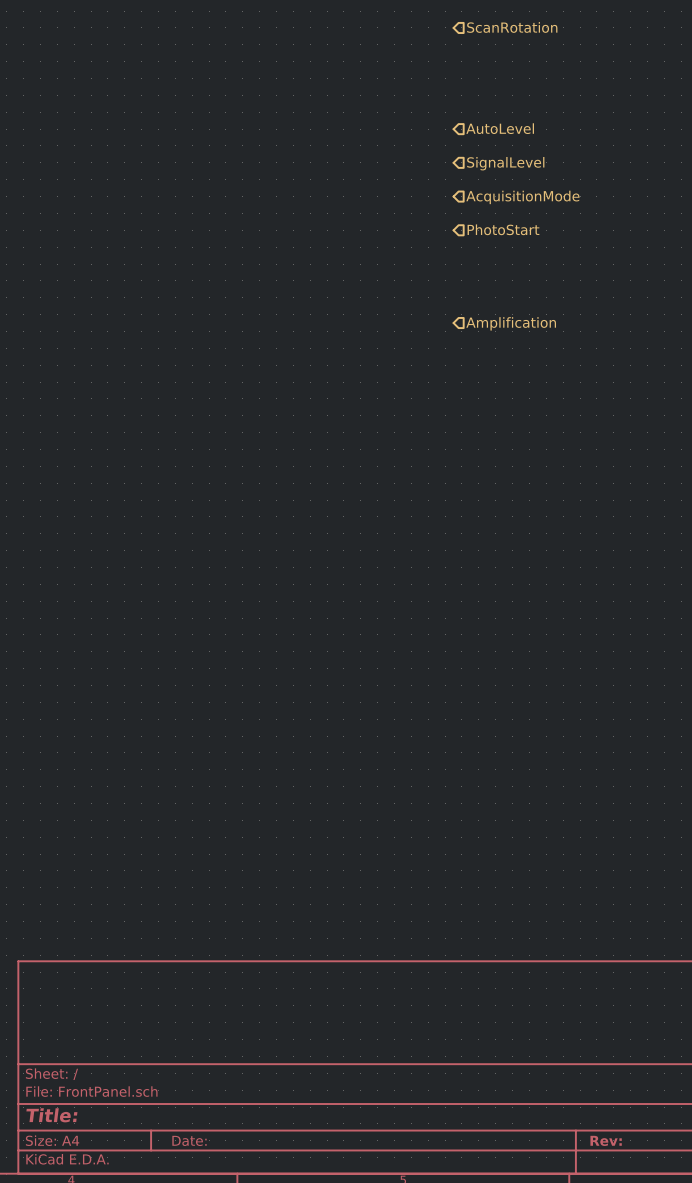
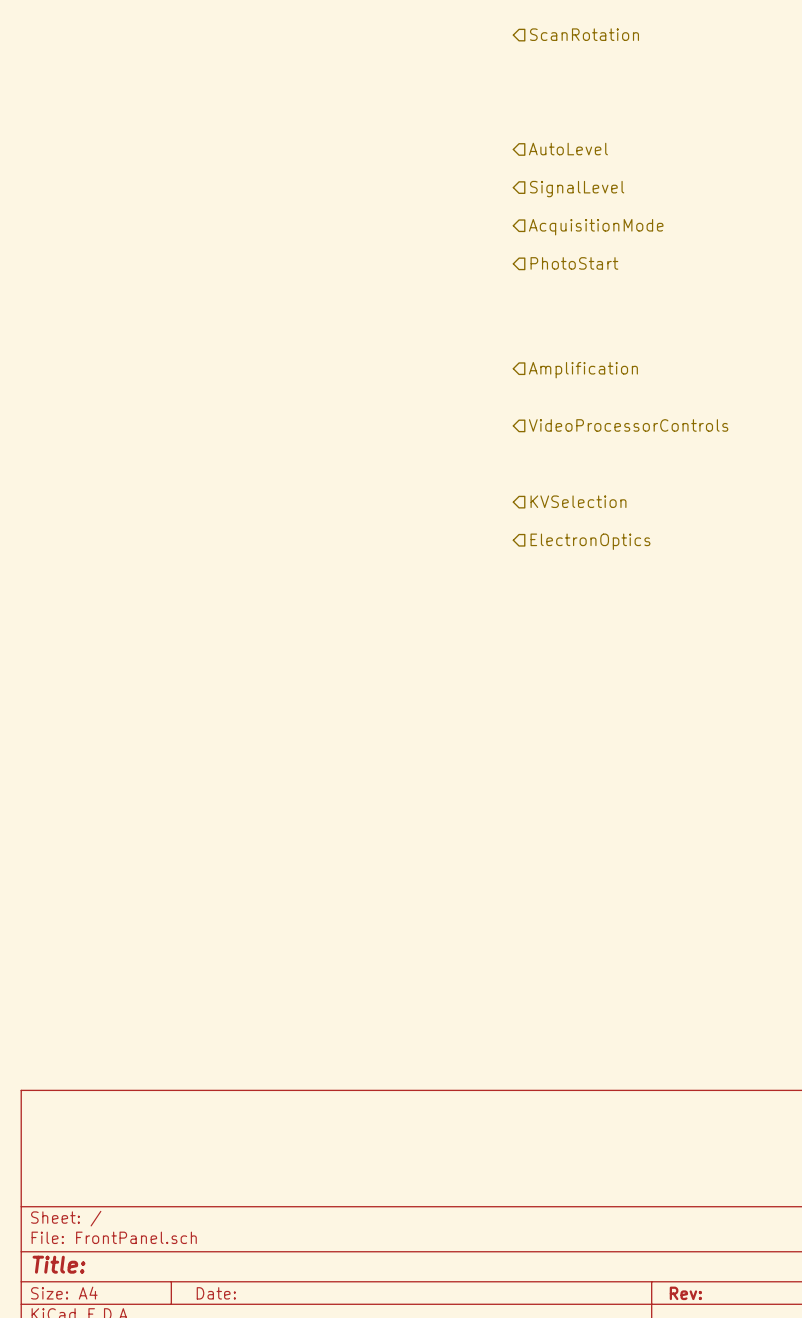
hierarchical label: none -> VideoProcessorControls (628, 425)
hierarchical label: none -> KVSelection (578, 501)
hierarchical label: none -> ElectronOptics (590, 541)

